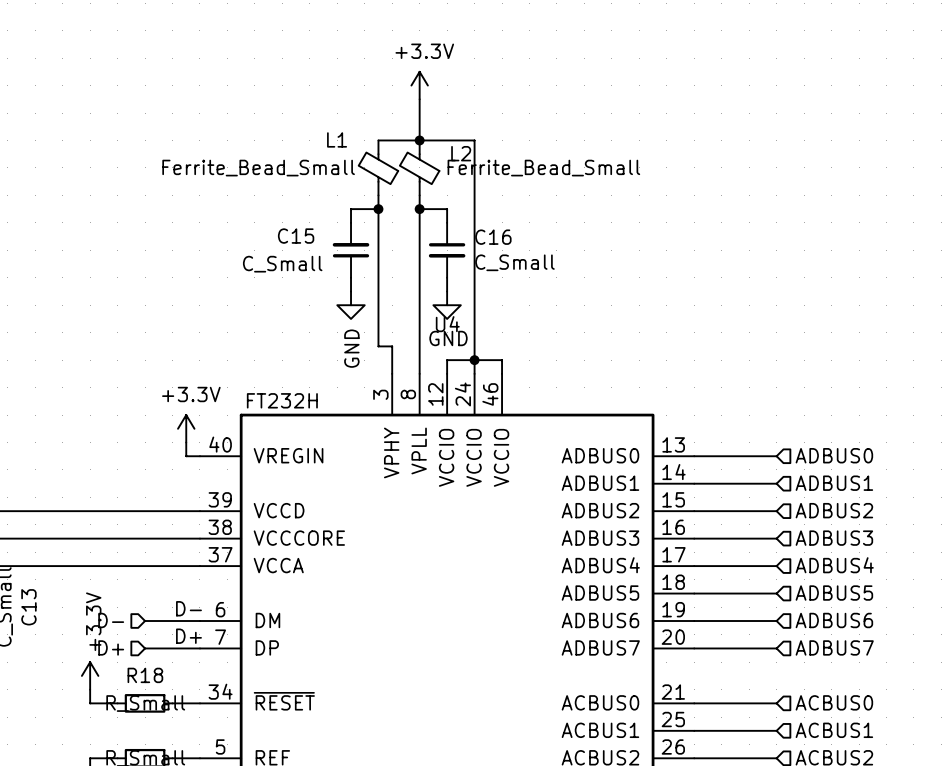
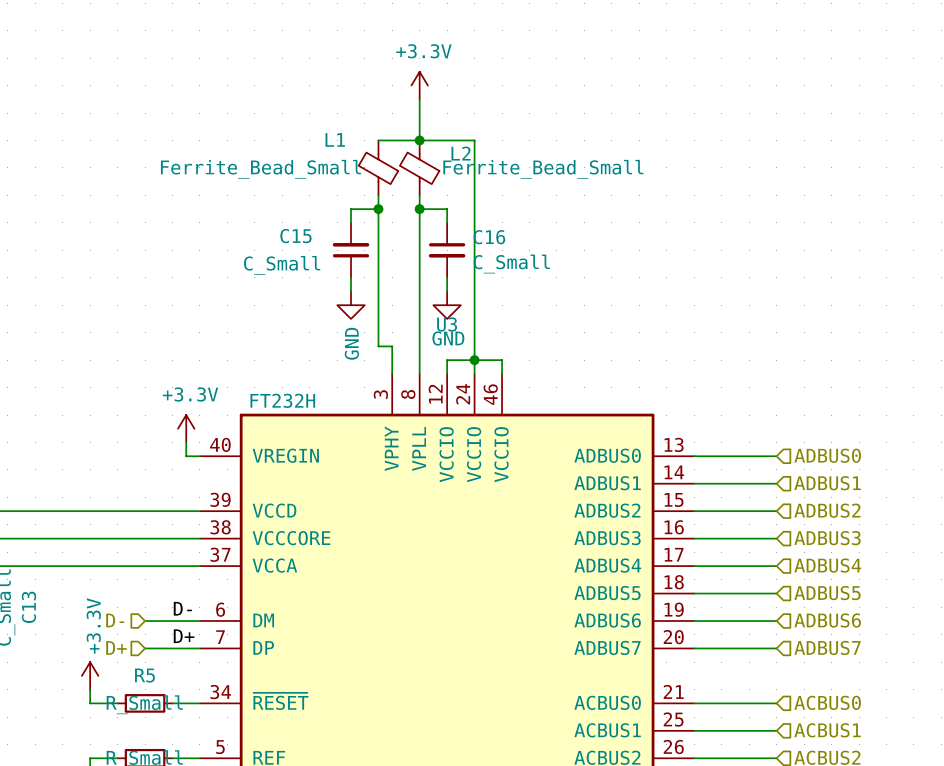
U4 name: U4 (447, 324) -> U3 (447, 324)
R18 name: R18 (145, 675) -> R5 (144, 675)

